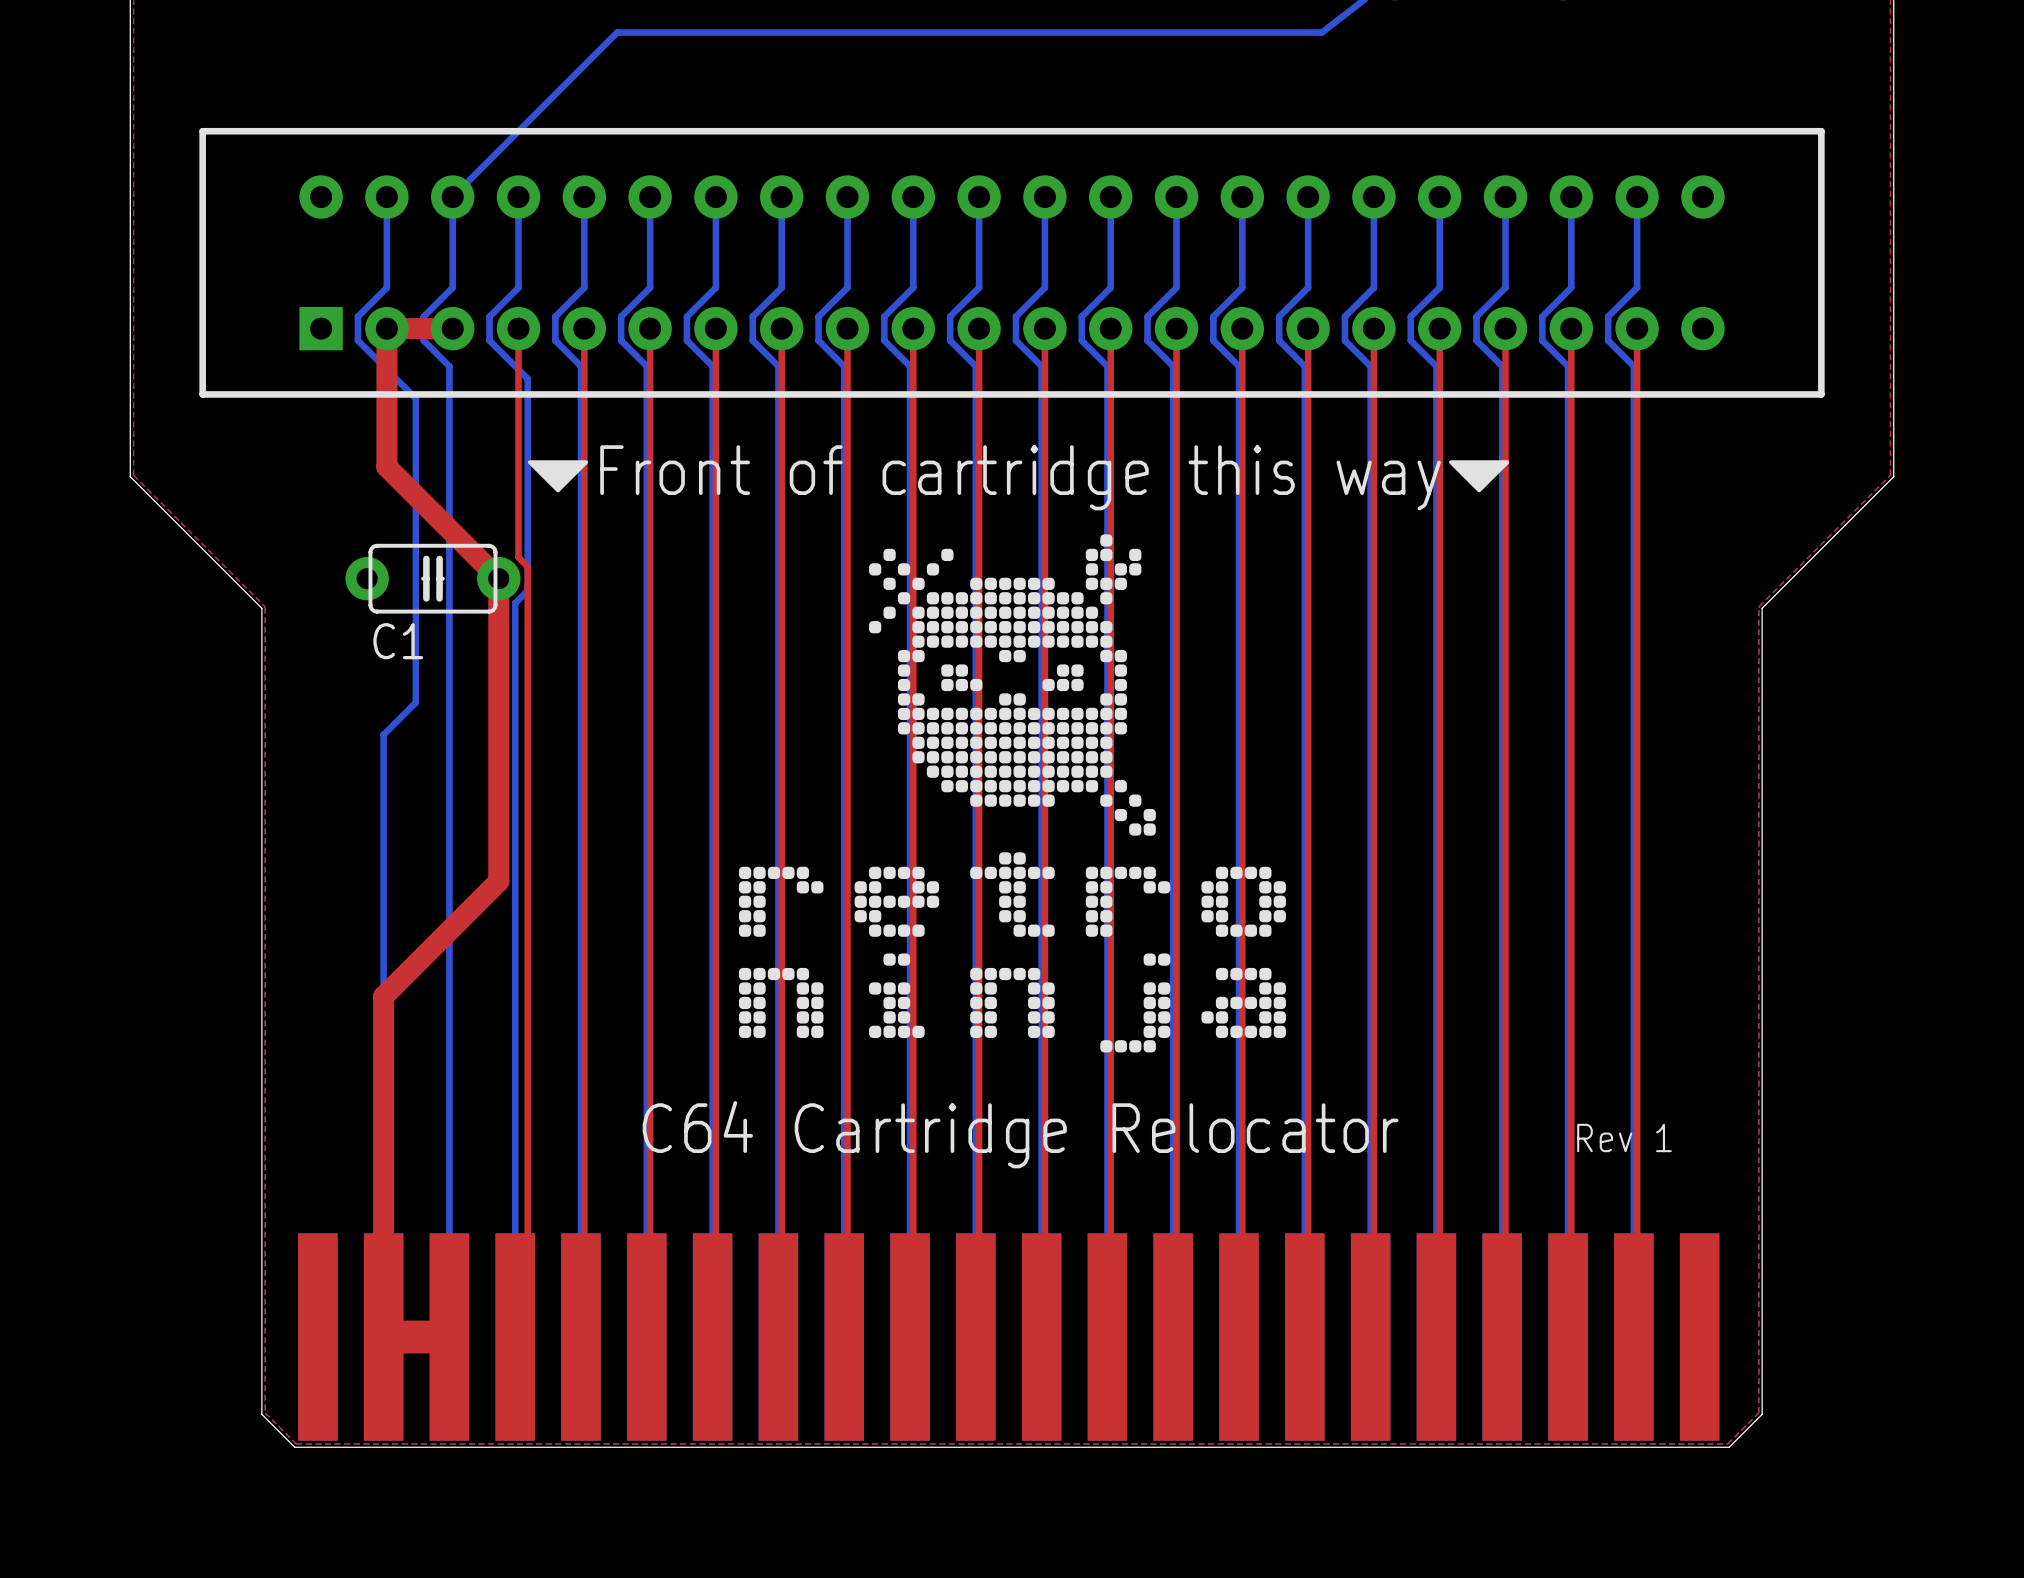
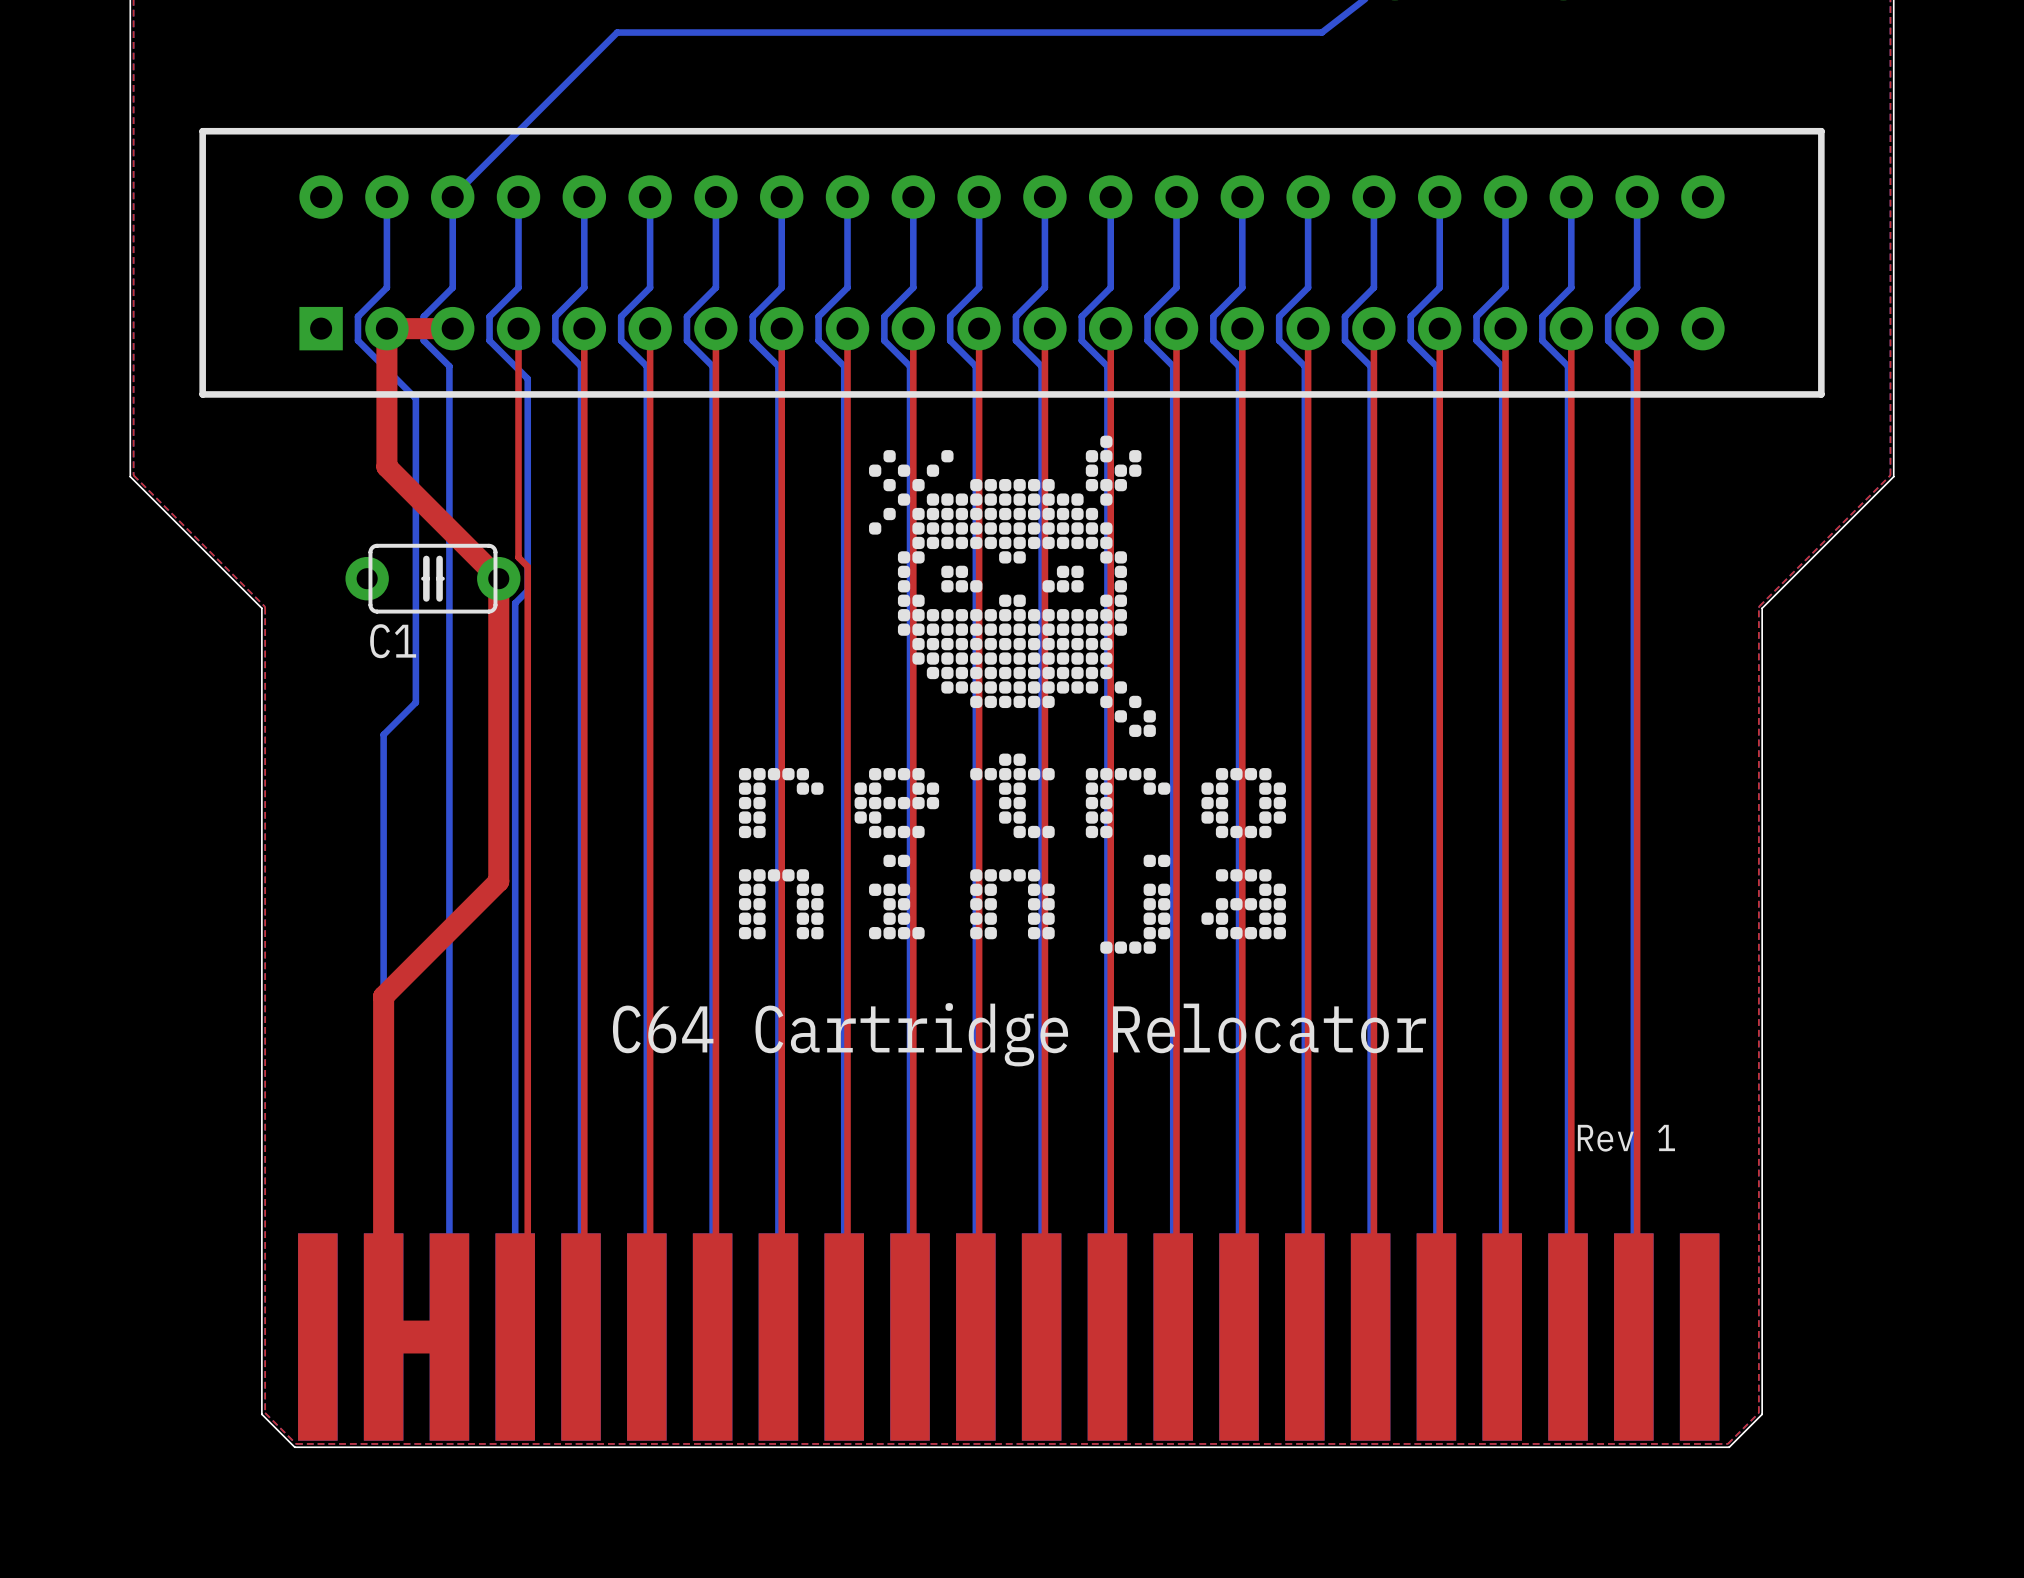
drawing: [527, 460, 589, 493] -> none
drawing: [1449, 460, 1510, 493] -> none
text: Front of cartridge this way (1020, 477) -> none
drawing position: (1012, 793) -> (1012, 694)
text position: C64 Cartridge Relocator (1020, 1134) -> C64 Cartridge Relocator (1019, 1034)

